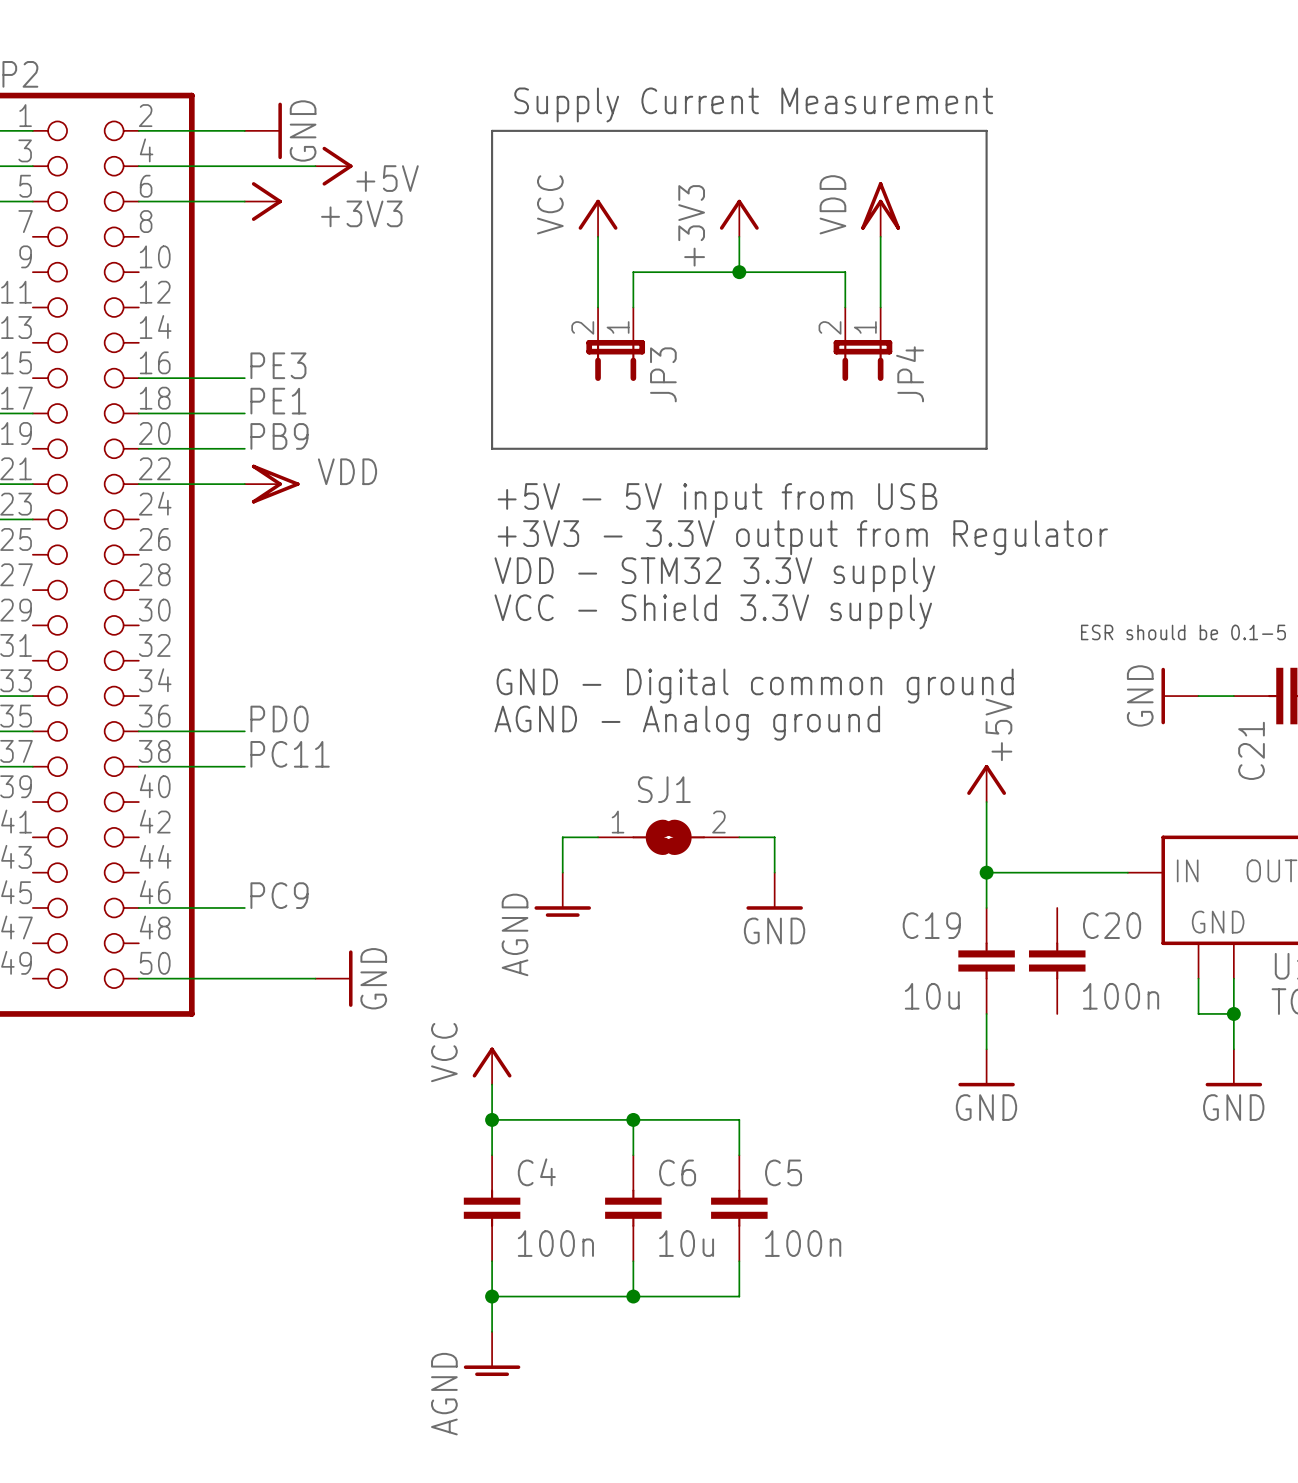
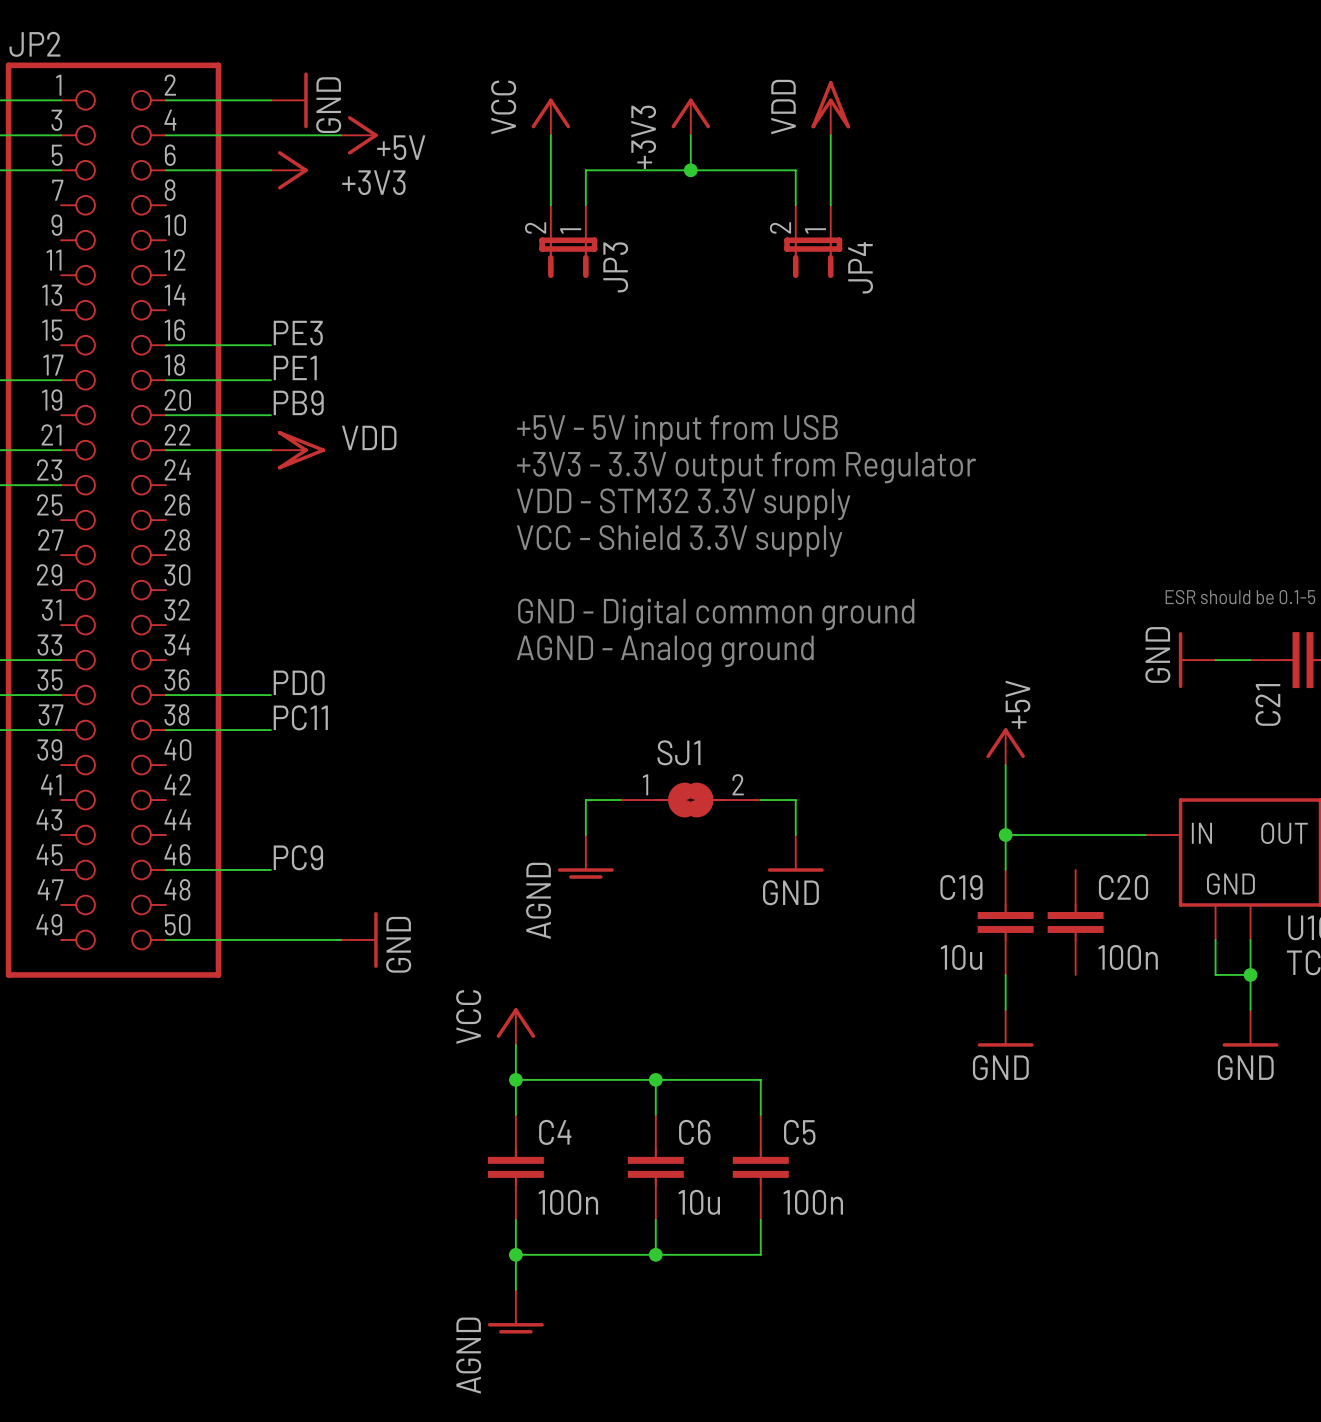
text: Supply Current Measurement (753, 104) -> none
line: (492, 130) (986, 130) (986, 448) (492, 448) (492, 130) -> none
junction: none -> (690, 170)
power symbol position: VDD (880, 209) -> VDD (830, 108)
power symbol position: VCC (598, 218) -> VCC (550, 116)
power symbol position: +3V3 (739, 218) -> +3V3 (690, 116)
wire: (598, 236) (598, 307) -> (550, 135) (550, 205)
wire: (739, 236) (739, 272) -> (690, 135) (690, 170)
wire: (880, 236) (880, 307) -> (830, 135) (830, 205)
junction: (739, 272) -> none
wire: (633, 307) (633, 272) (845, 272) (845, 307) -> (585, 205) (585, 170) (795, 170) (795, 205)
JP3 position: (615, 344) -> (568, 241)
JP4 position: (862, 344) -> (813, 241)
text position: +5V - 5V input from USB (717, 500) -> +5V - 5V input from USB (677, 430)
text position: +3V3 - 3.3V output from Regulator (802, 537) -> +3V3 - 3.3V output from Regulator (746, 467)
text position: VDD - STM32 3.3V supply (714, 574) -> VDD - STM32 3.3V supply (683, 504)
text position: VCC - Shield 3.3V supply (713, 611) -> VCC - Shield 3.3V supply (679, 540)
text position: GND - Digital common ground (755, 686) -> GND - Digital common ground (716, 614)
text position: AGND - Analog ground (687, 723) -> AGND - Analog ground (665, 651)

